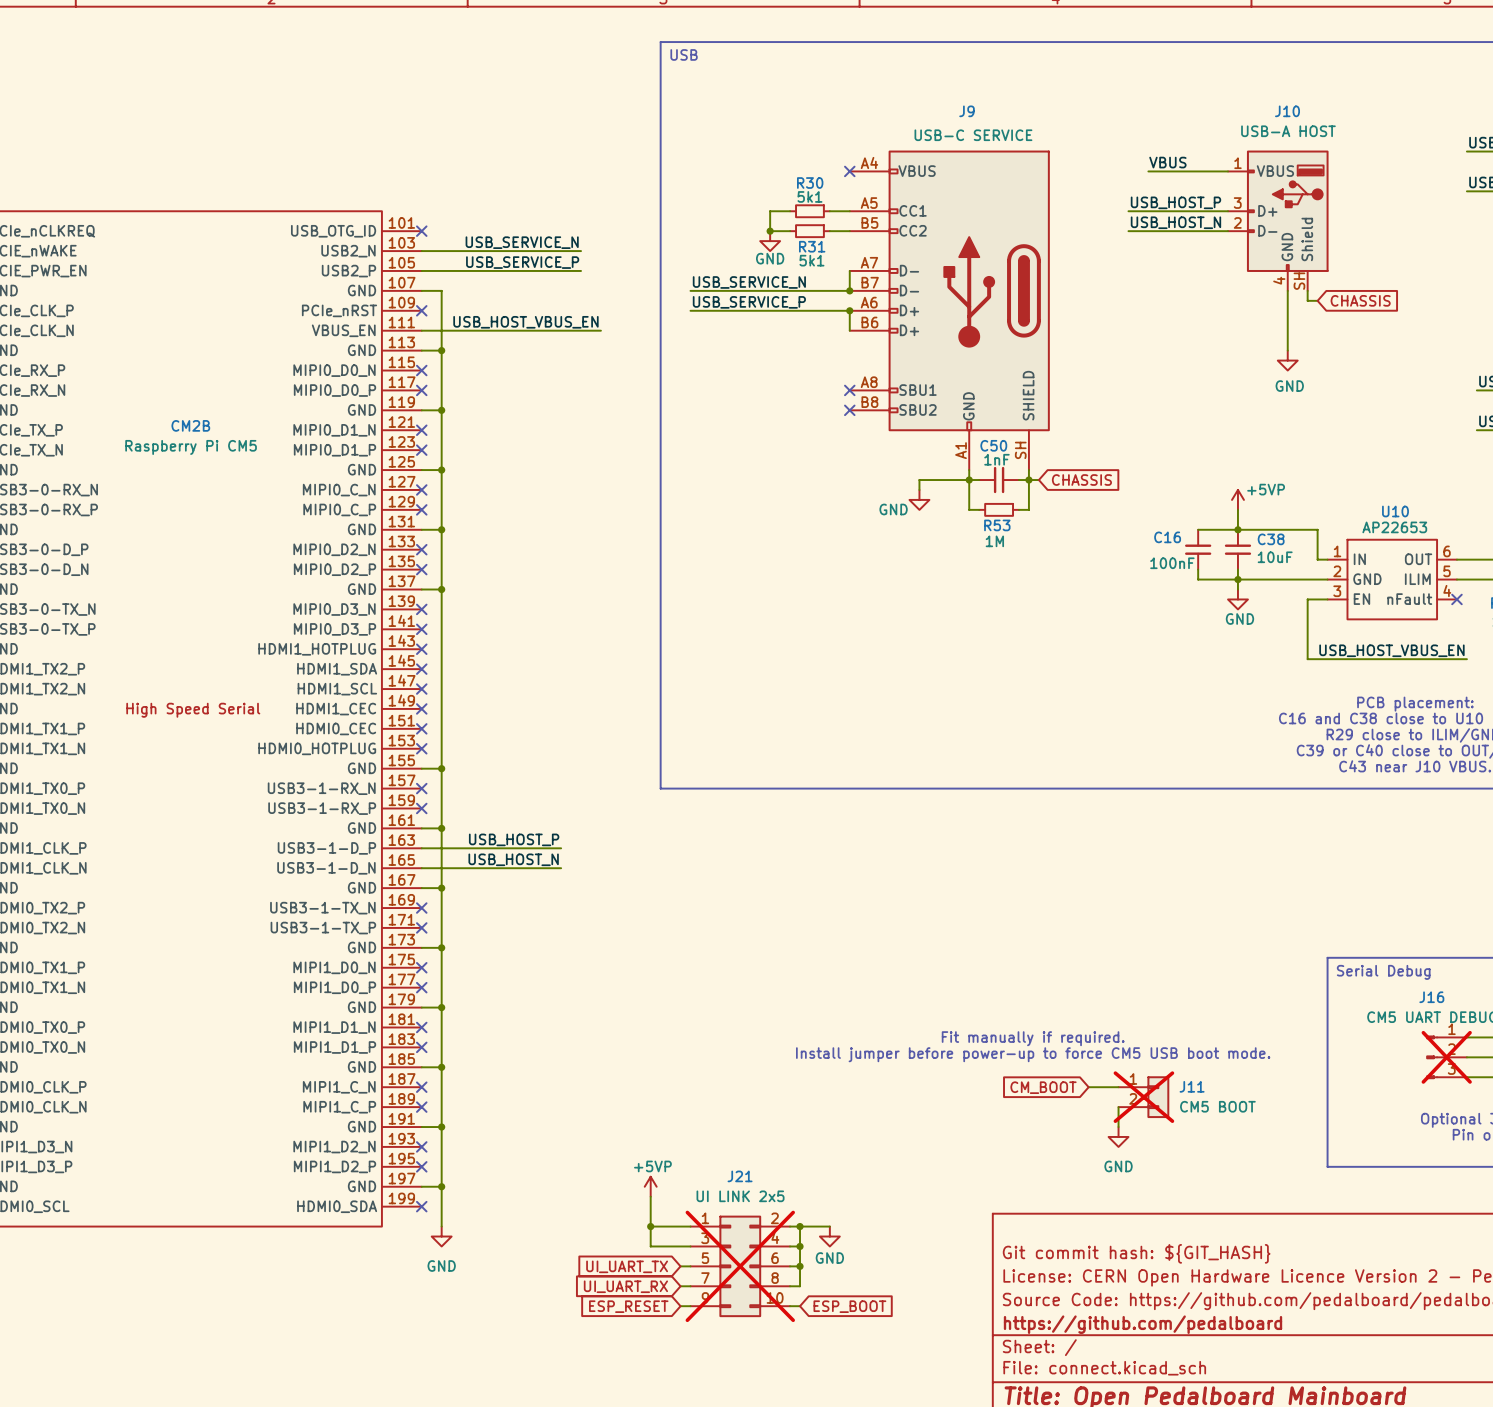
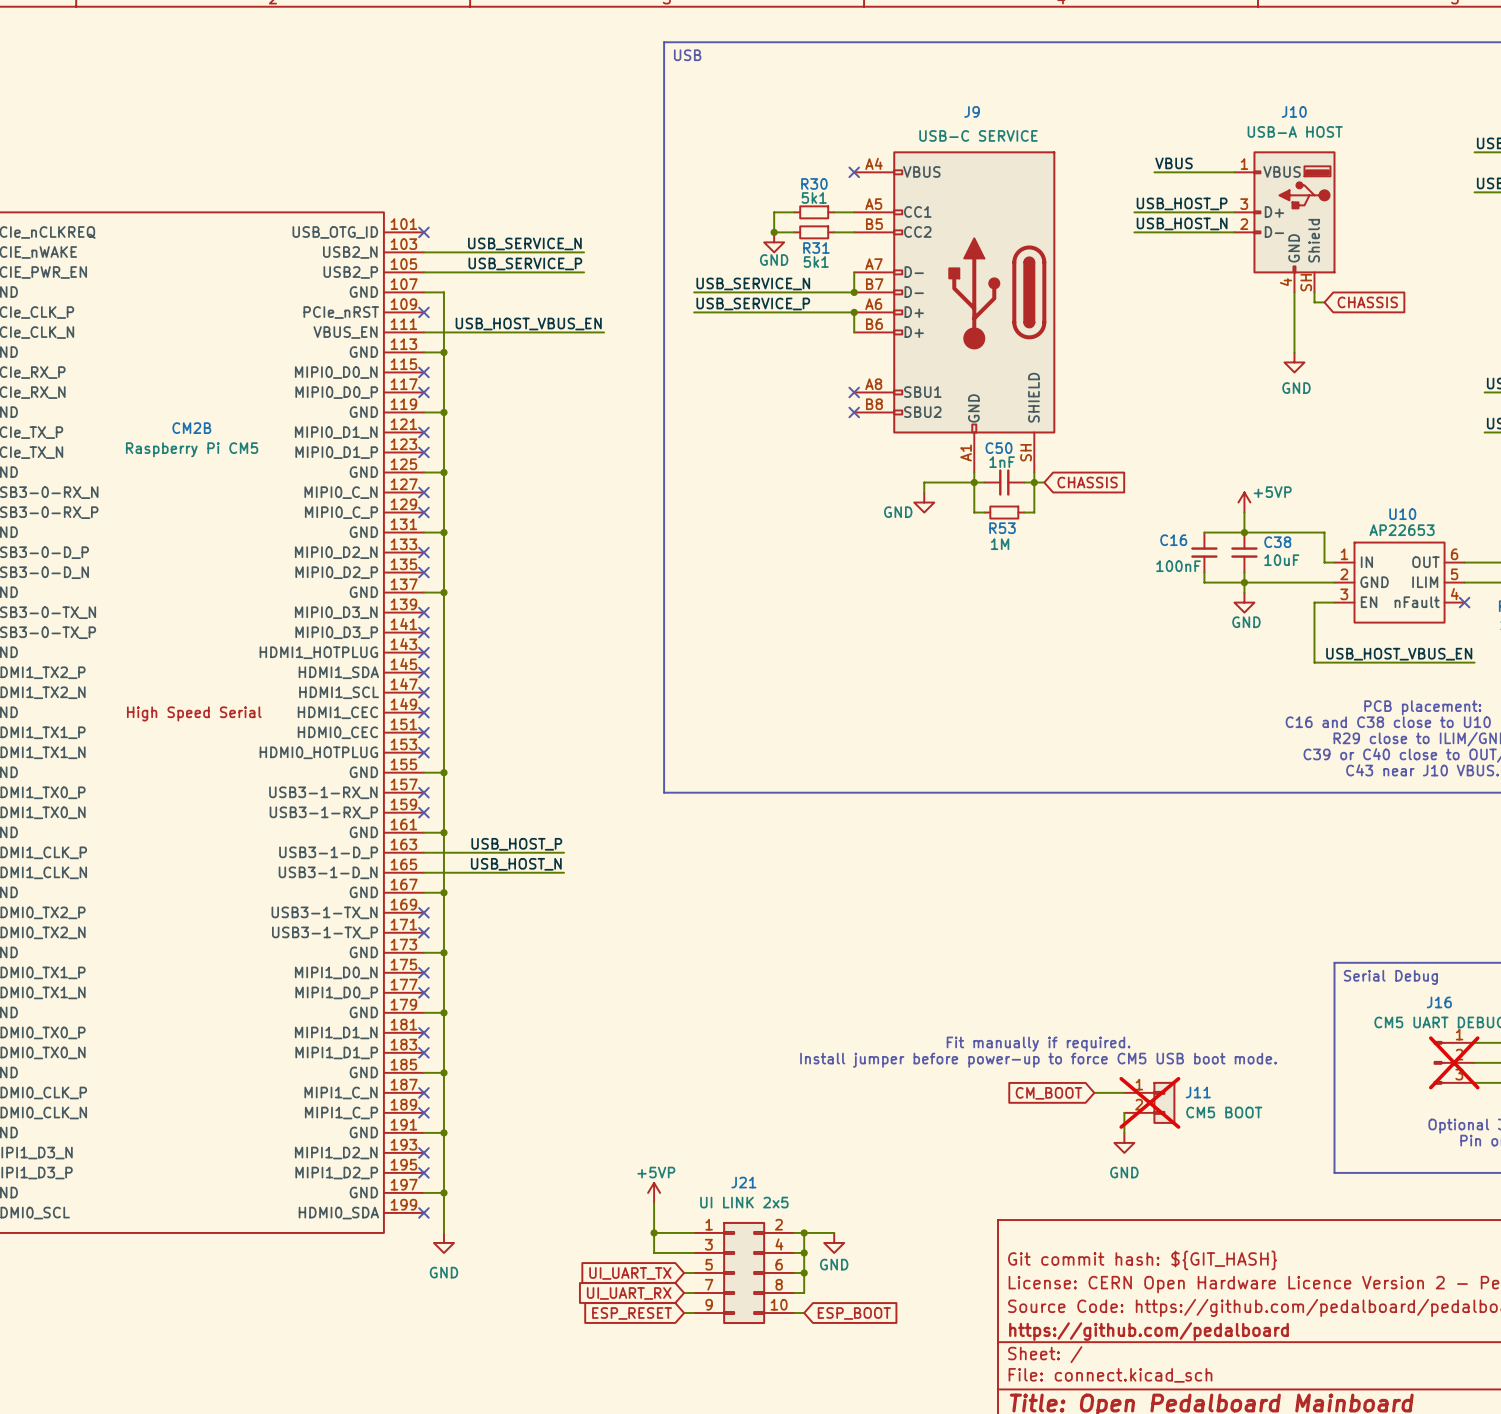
J21 do-not-place cross: (740, 1266) -> none

